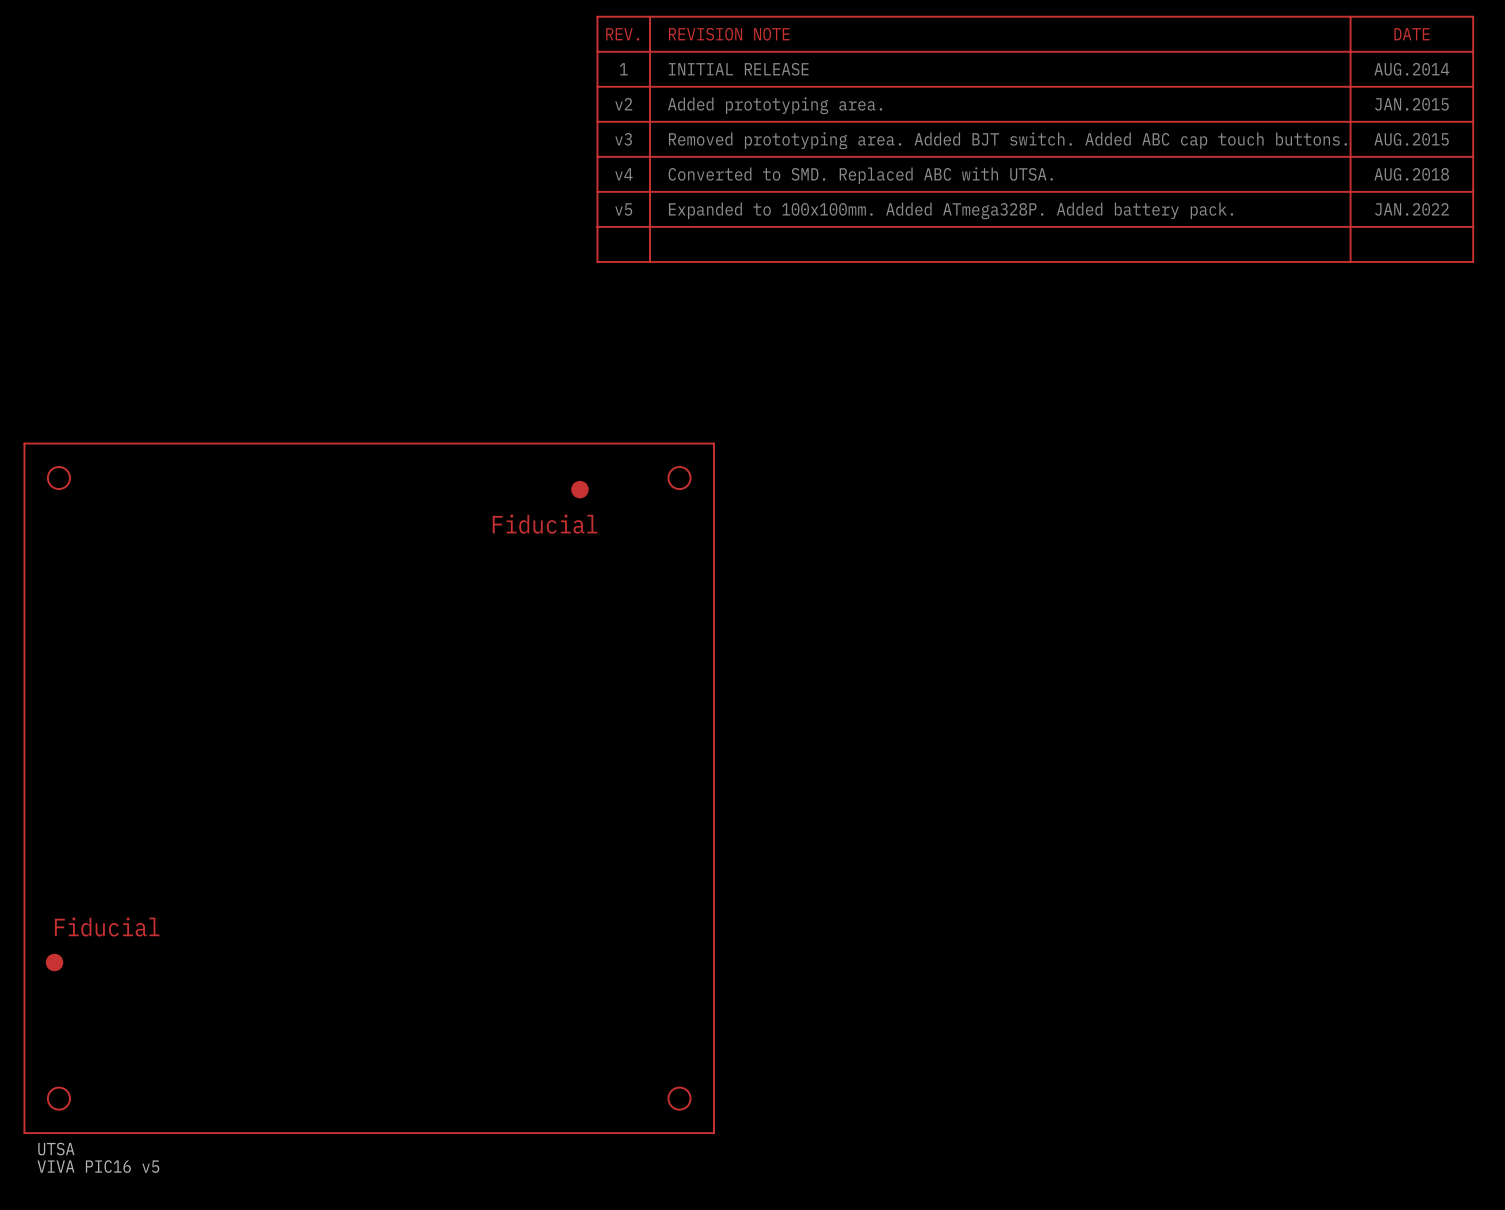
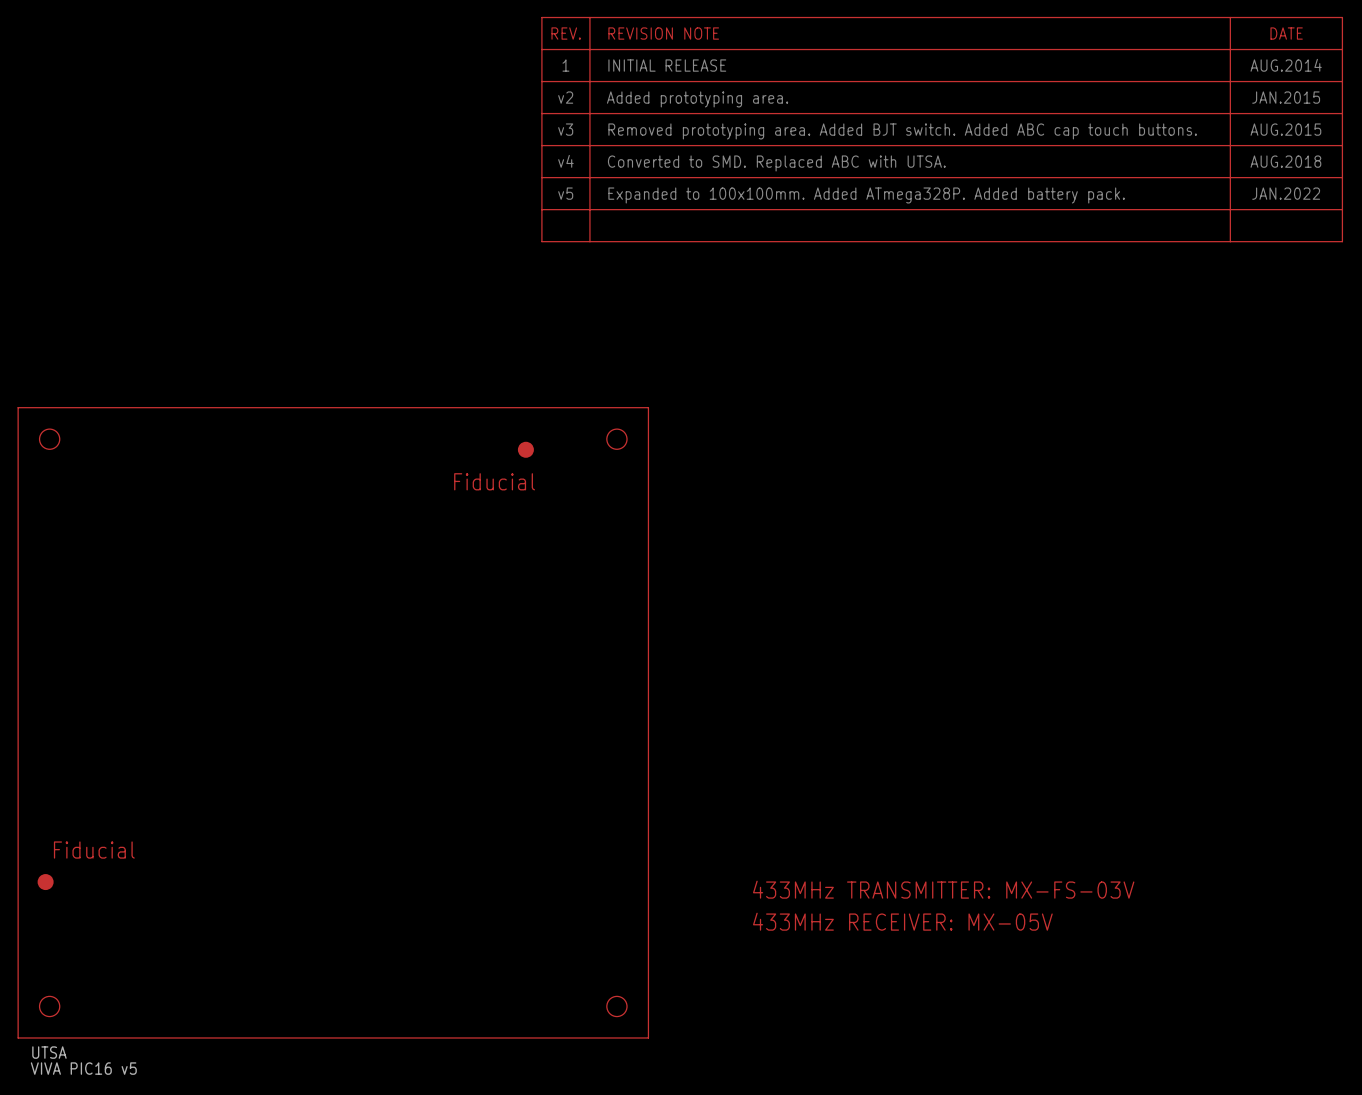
text: none -> 433MHz TRANSMITTER: MX-FS-03V (943, 889)
text: none -> 433MHz RECEIVER: MX-05V (902, 921)

